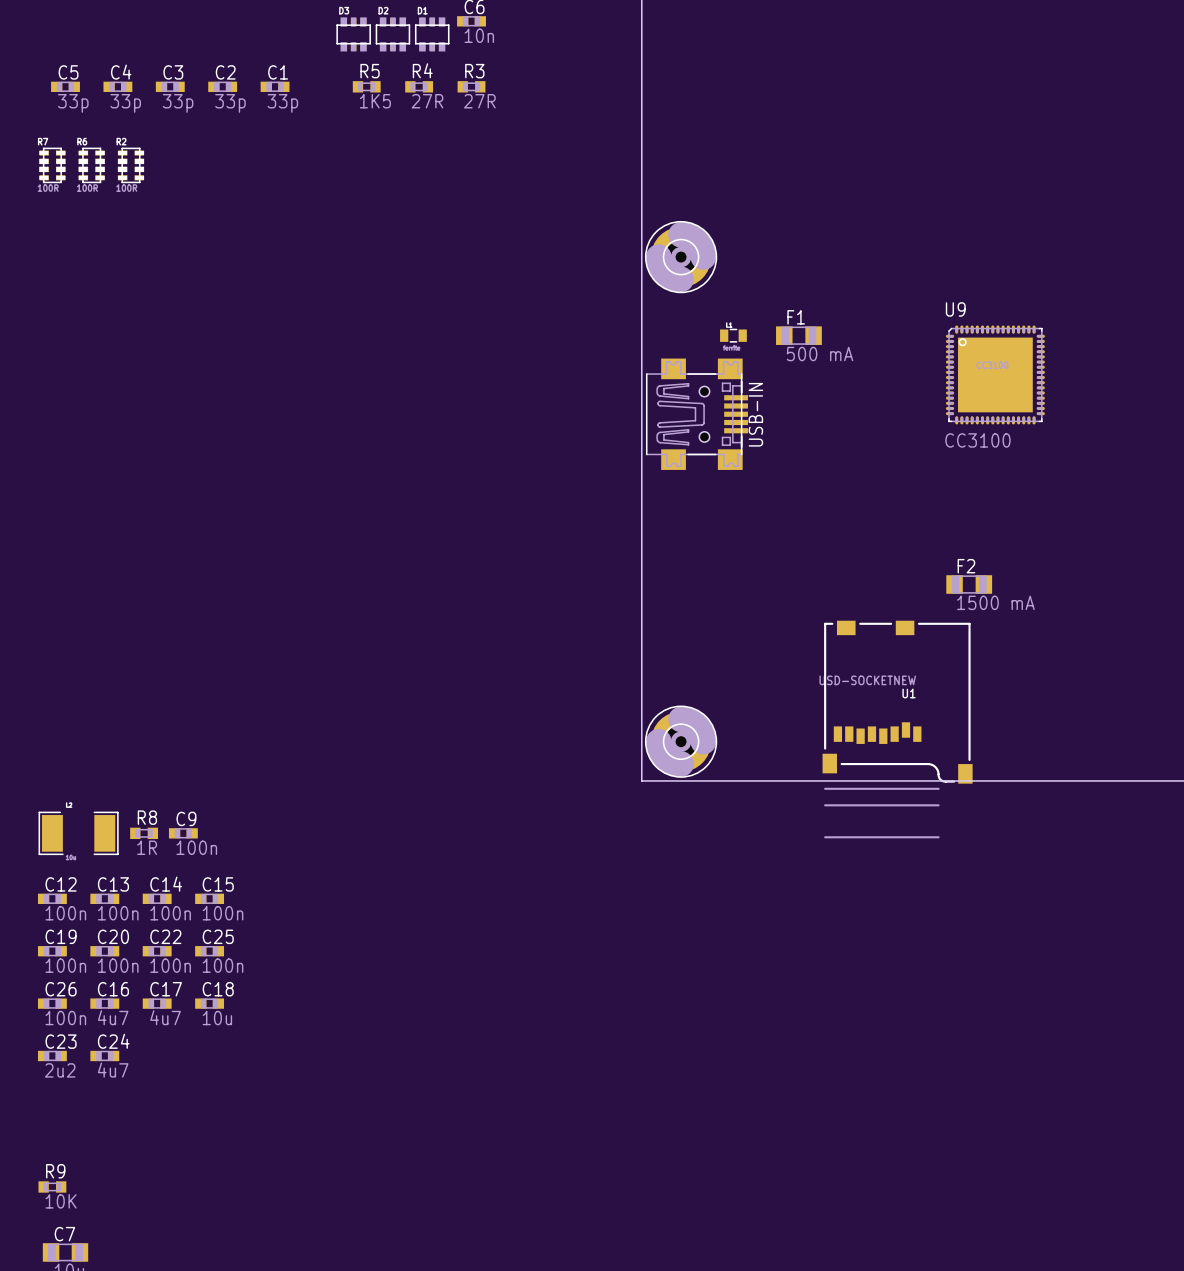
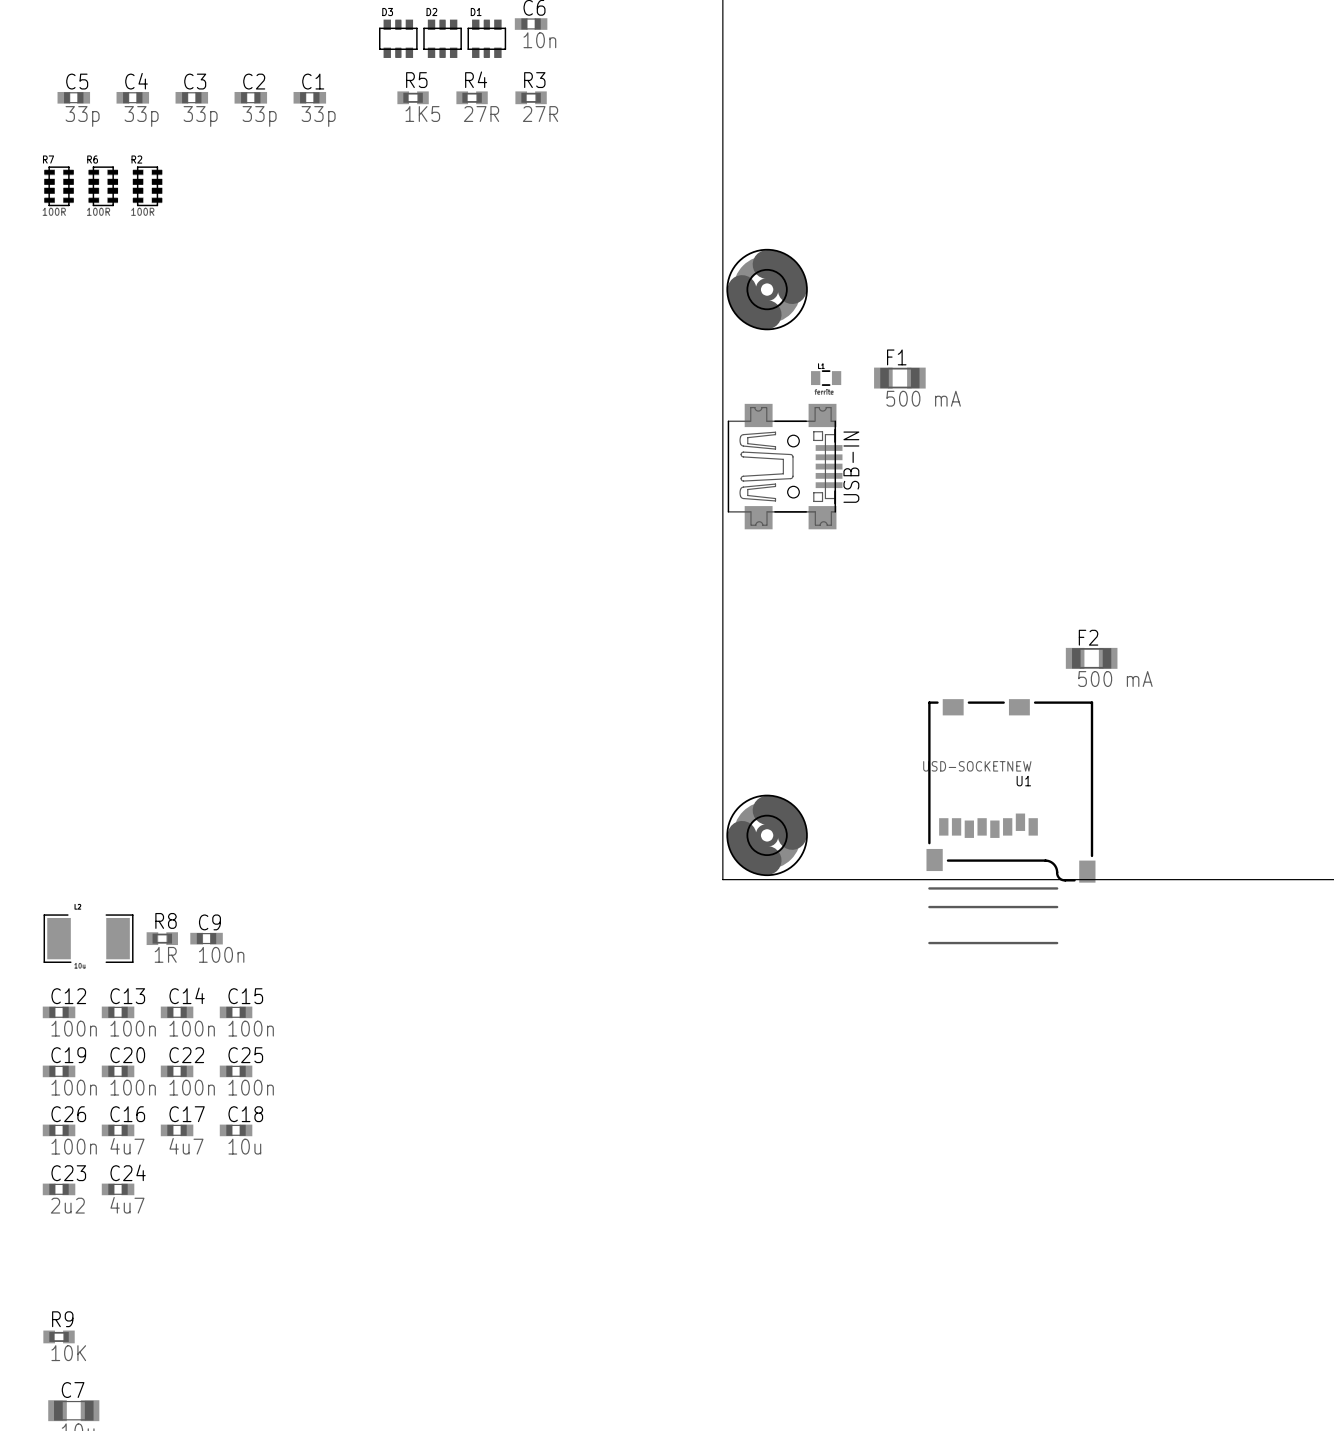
U9: CC3100 (995, 374) -> none
F2 value: 1500 mA (995, 602) -> 500 mA (1115, 679)

